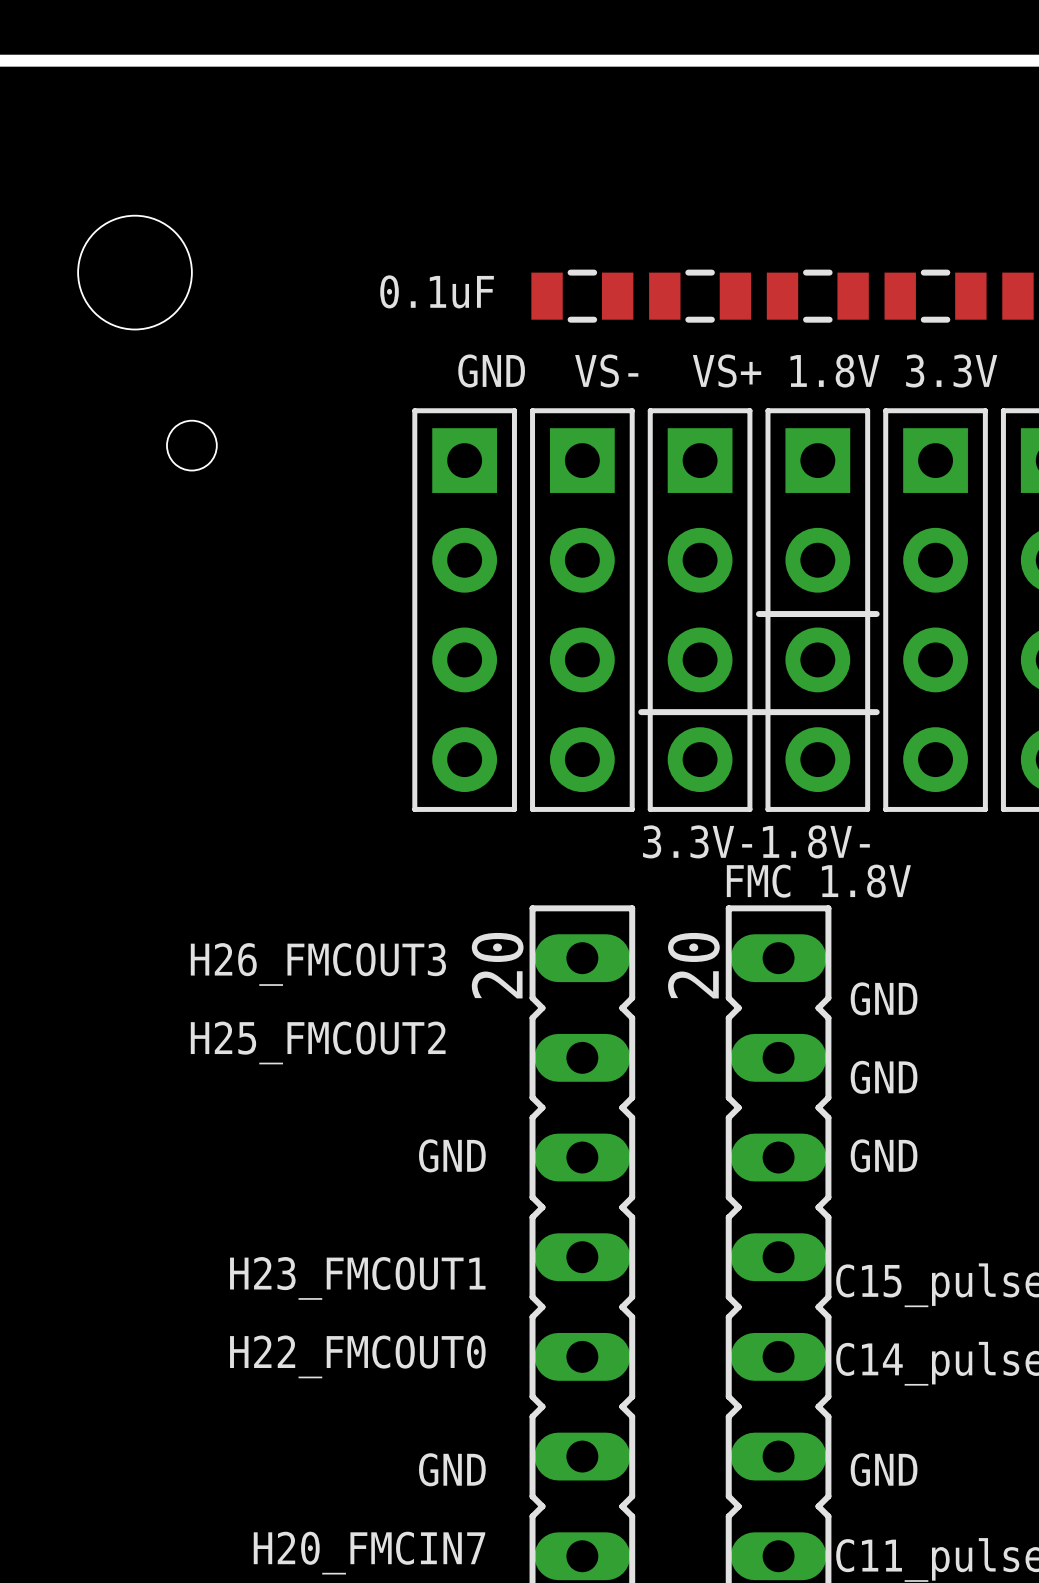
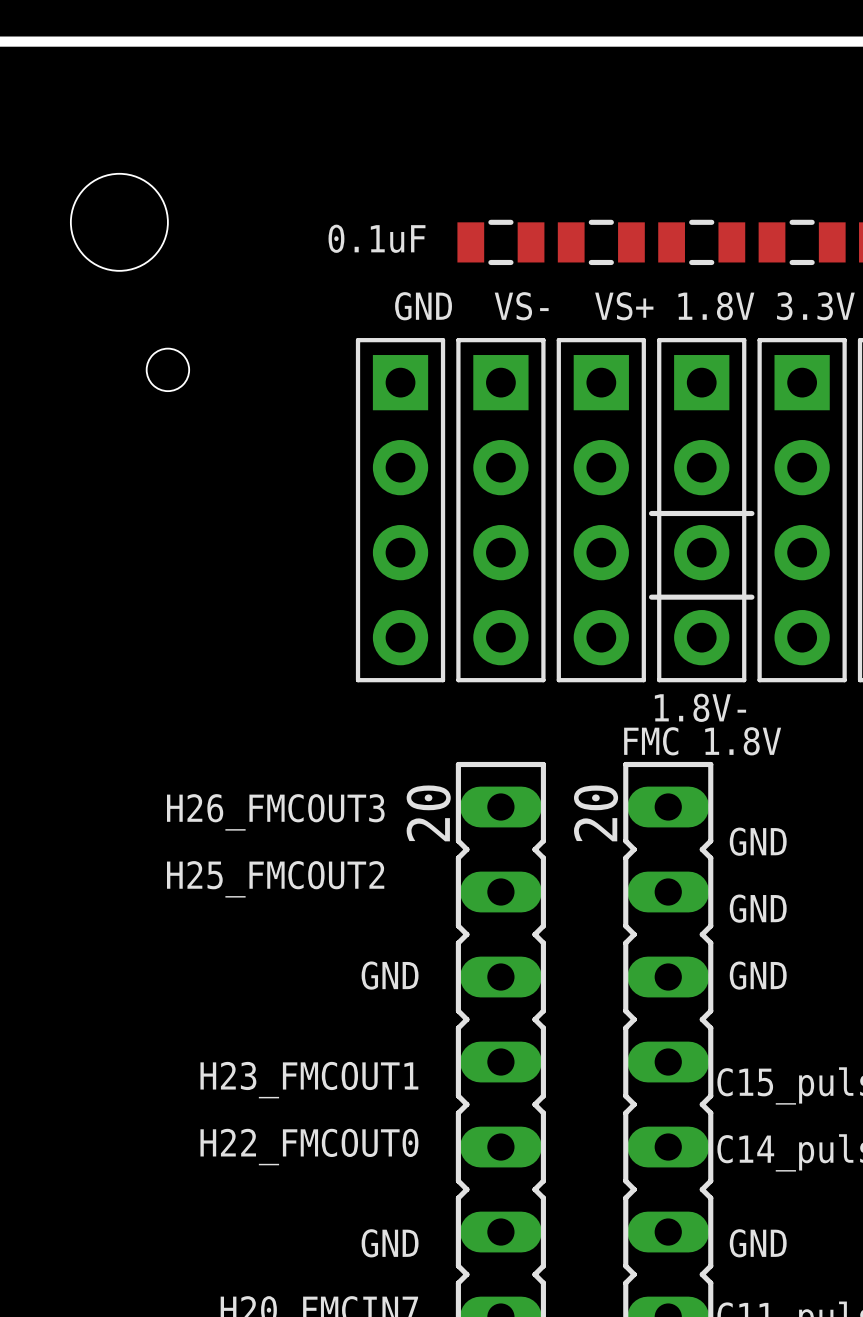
line: (641, 712) (758, 712) -> none
text: 3.3V- (697, 841) -> none

